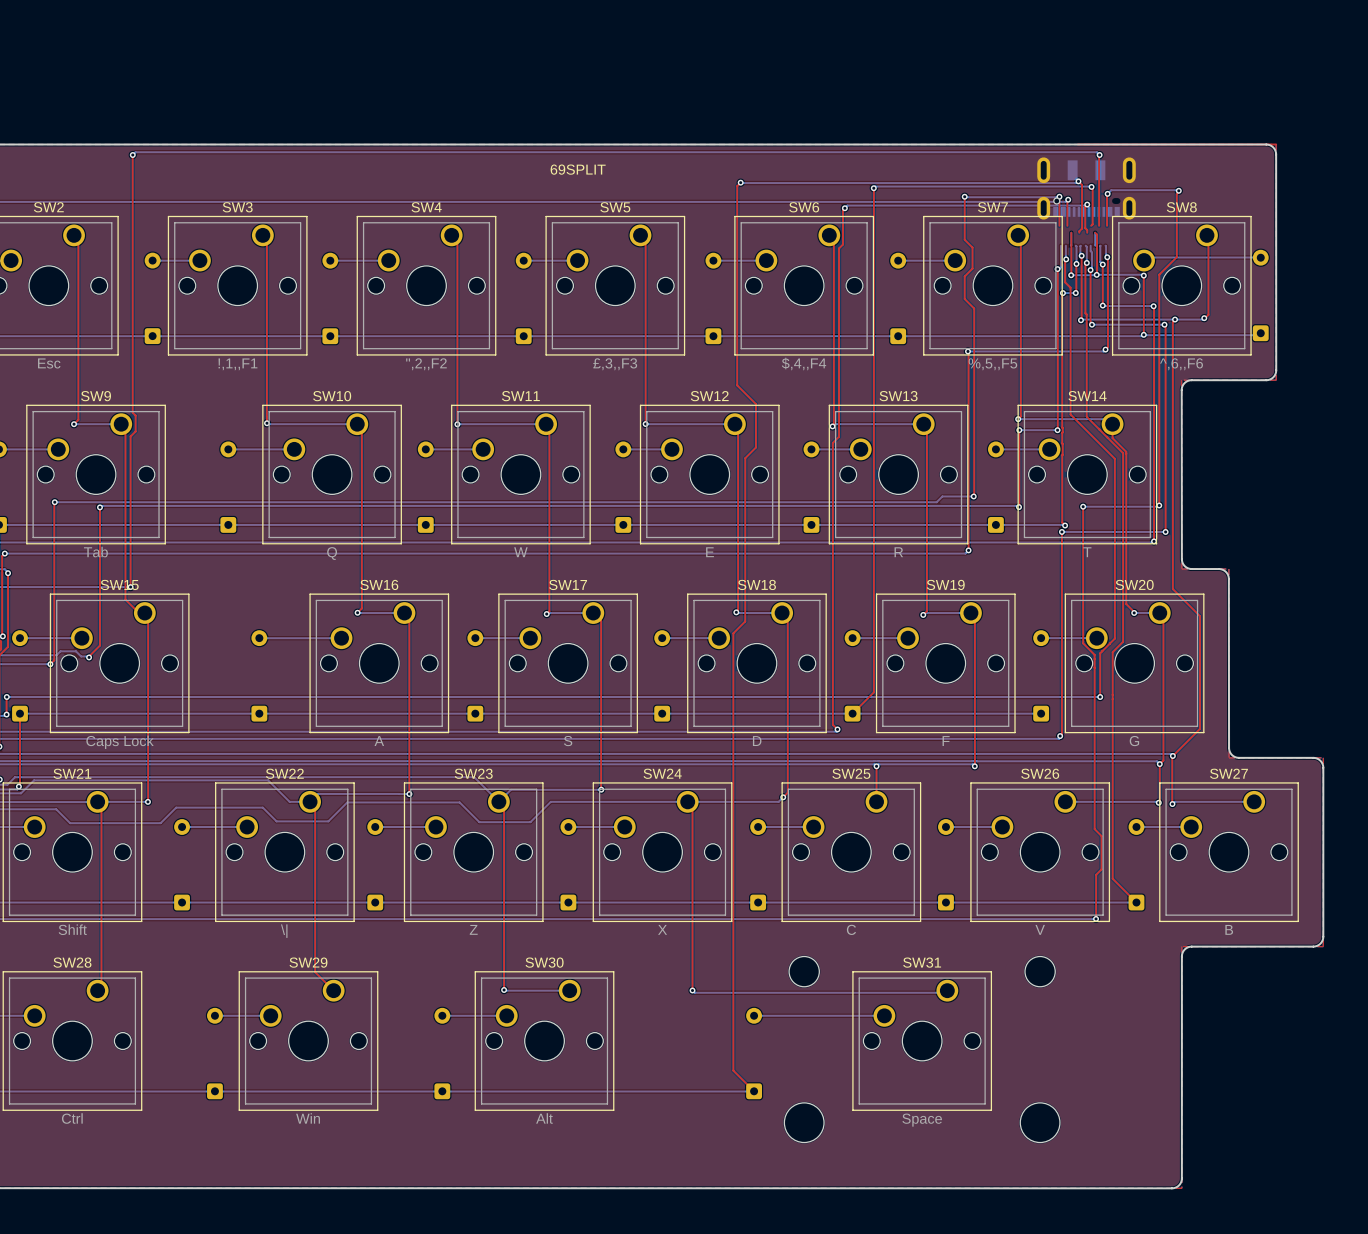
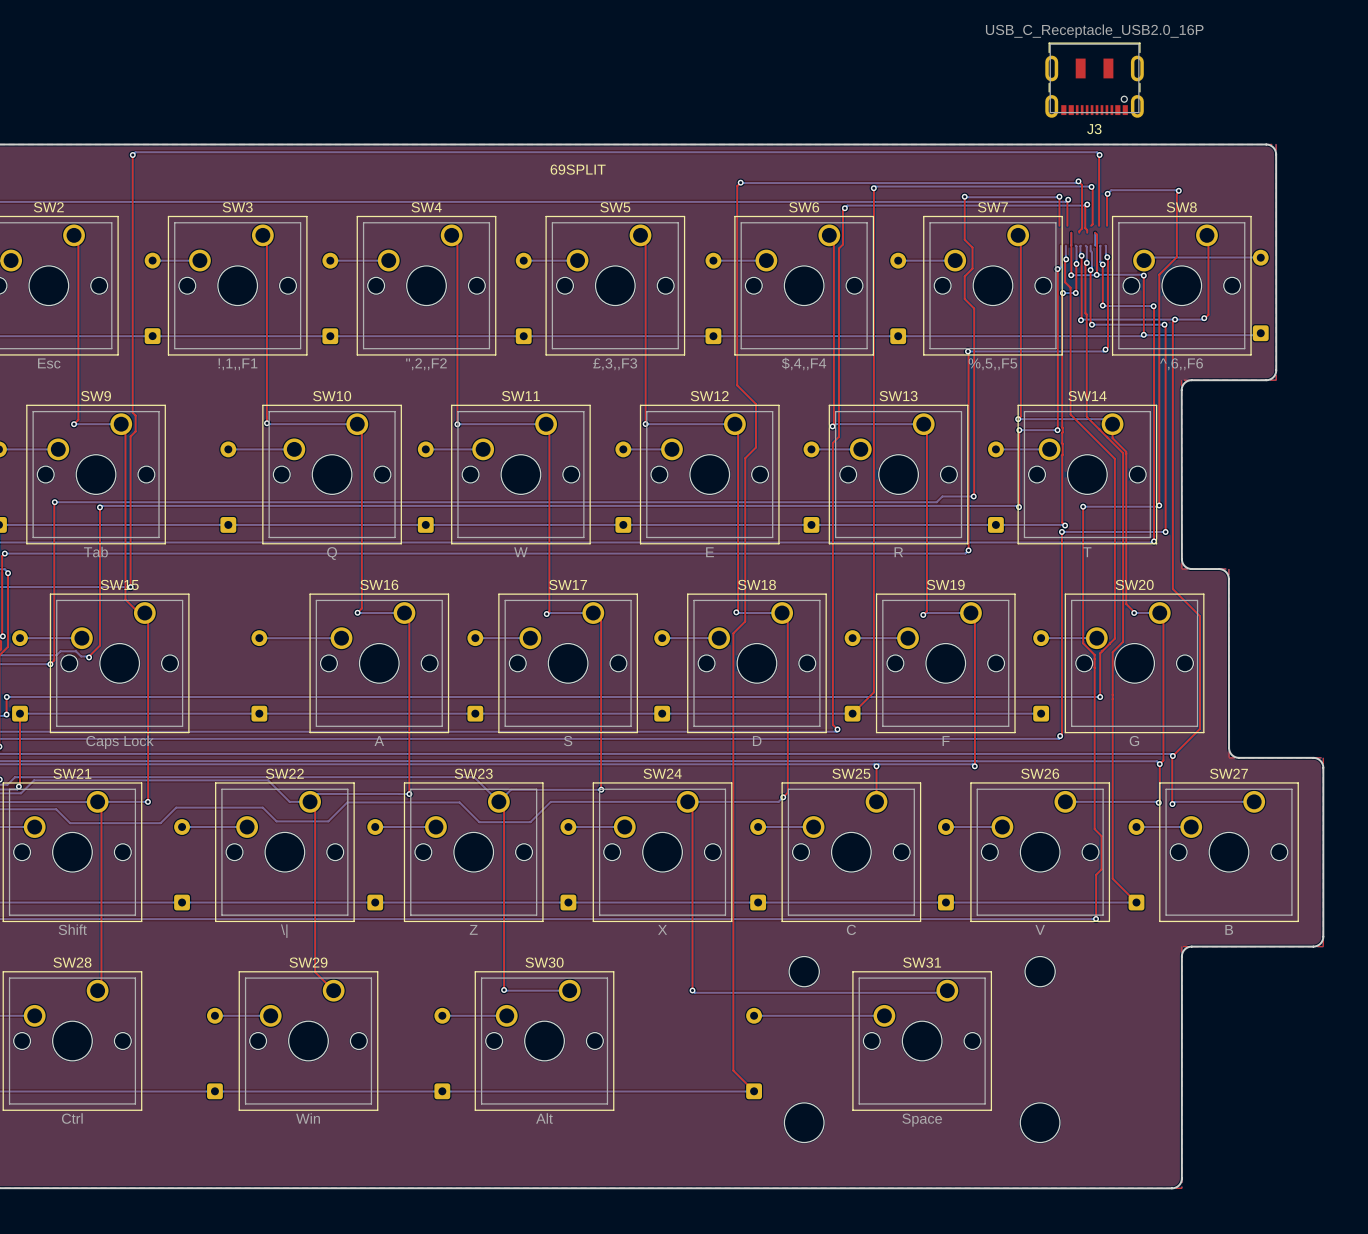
top track: (1077, 144) (1276, 144) -> none
J3 side: bottom (1086, 188) -> top (1094, 80)

